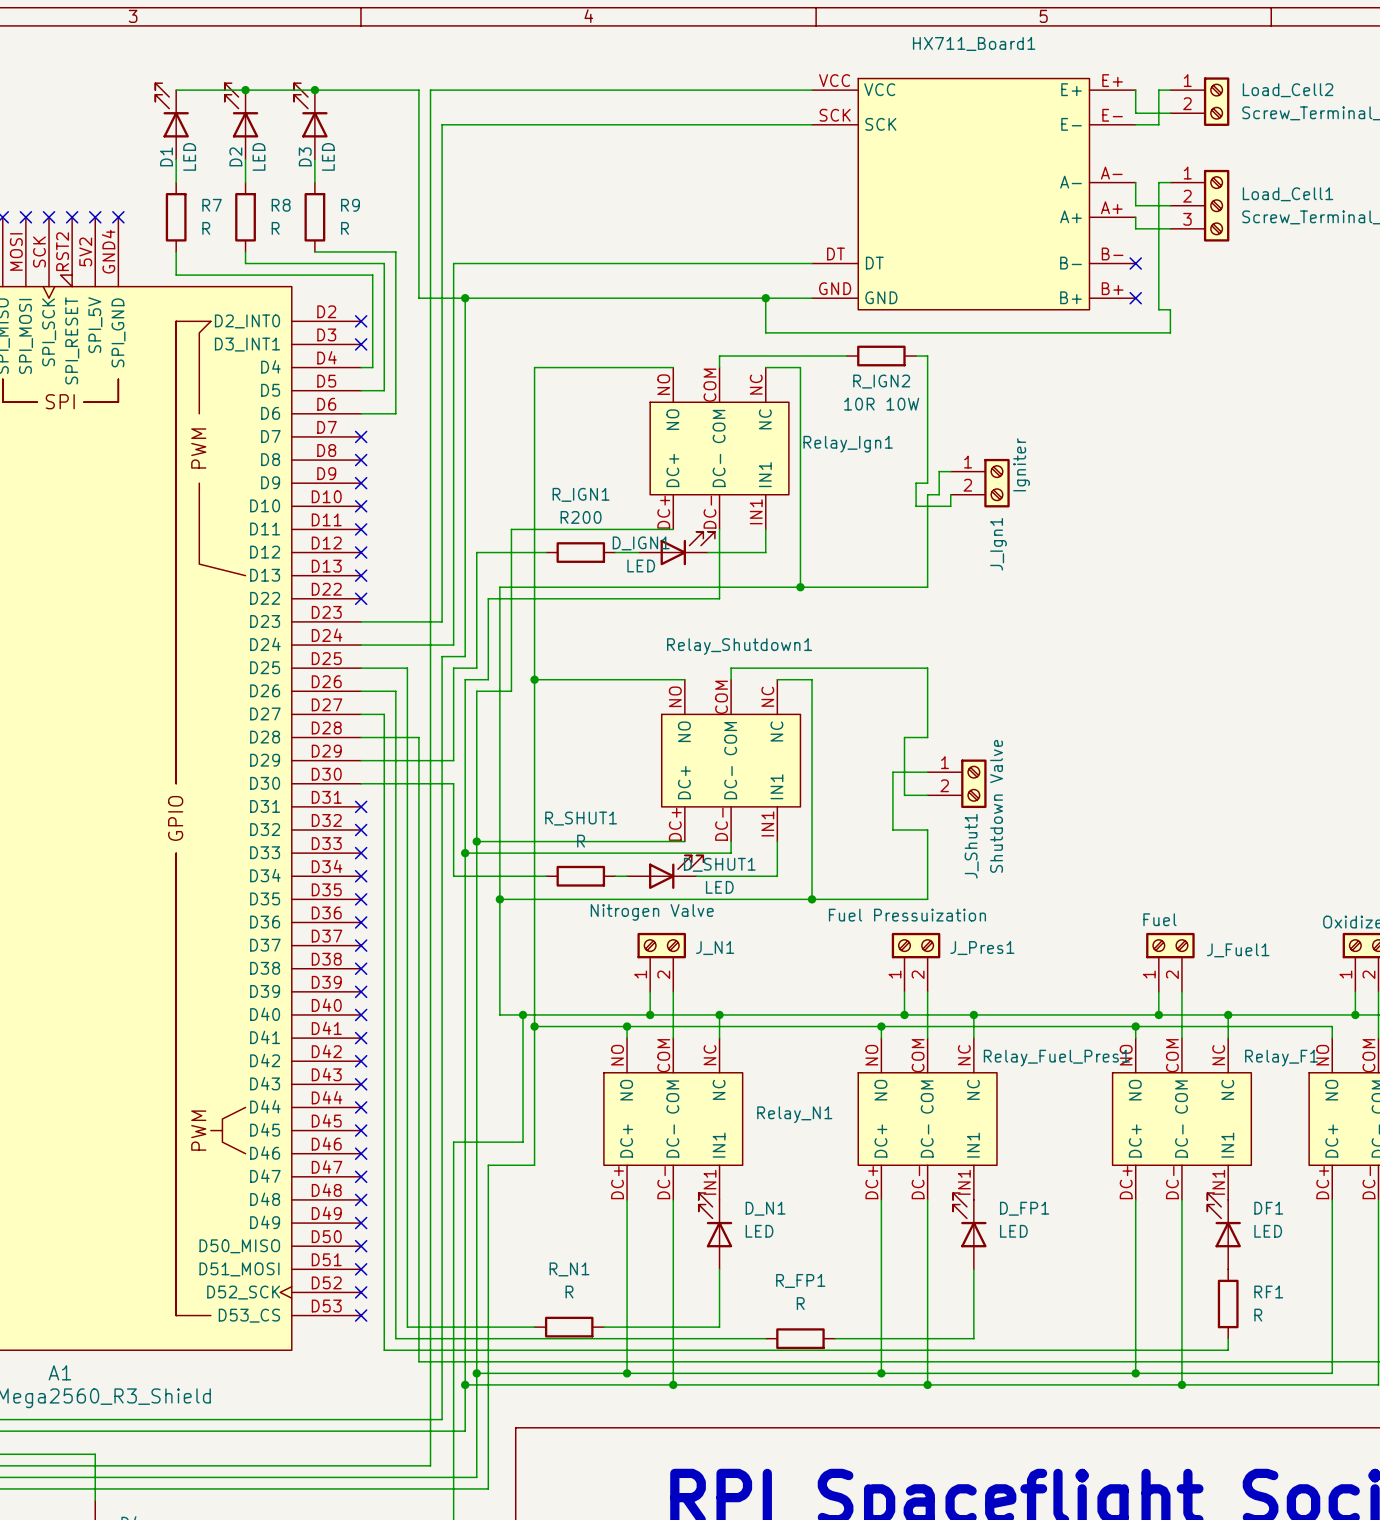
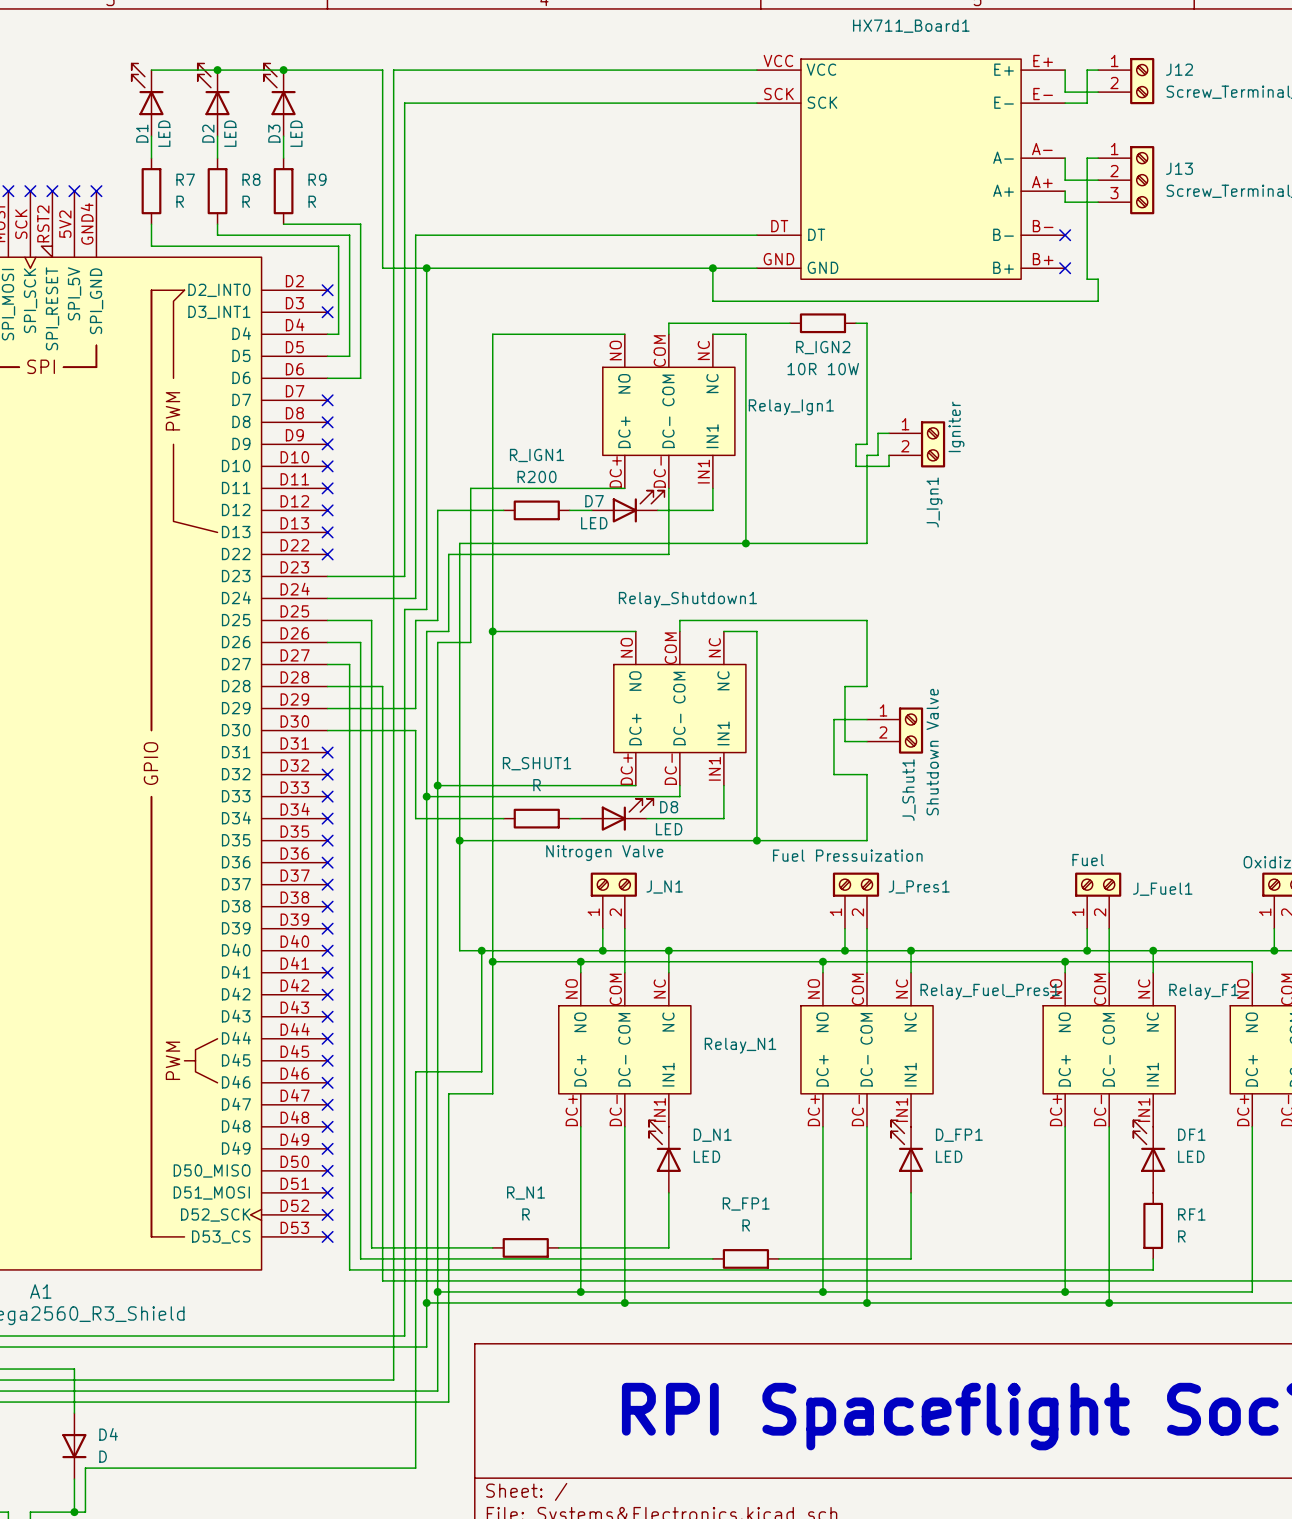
Load_Cell2 name: Load_Cell2 (1288, 90) -> J12 (1179, 69)
Load_Cell1 name: Load_Cell1 (1288, 194) -> J13 (1179, 168)
D_IGN1 name: D_IGN1 (641, 543) -> D7 (594, 501)
D_SHUT1 name: D_SHUT1 (719, 864) -> D8 (669, 807)

